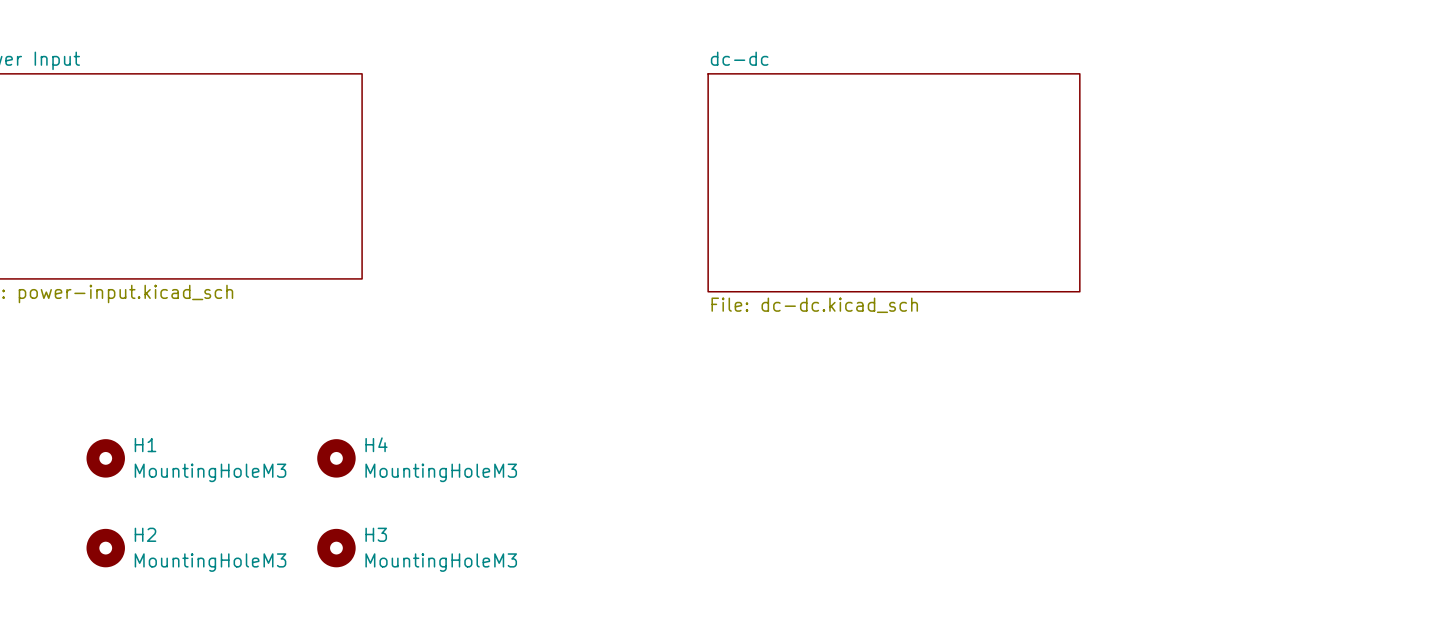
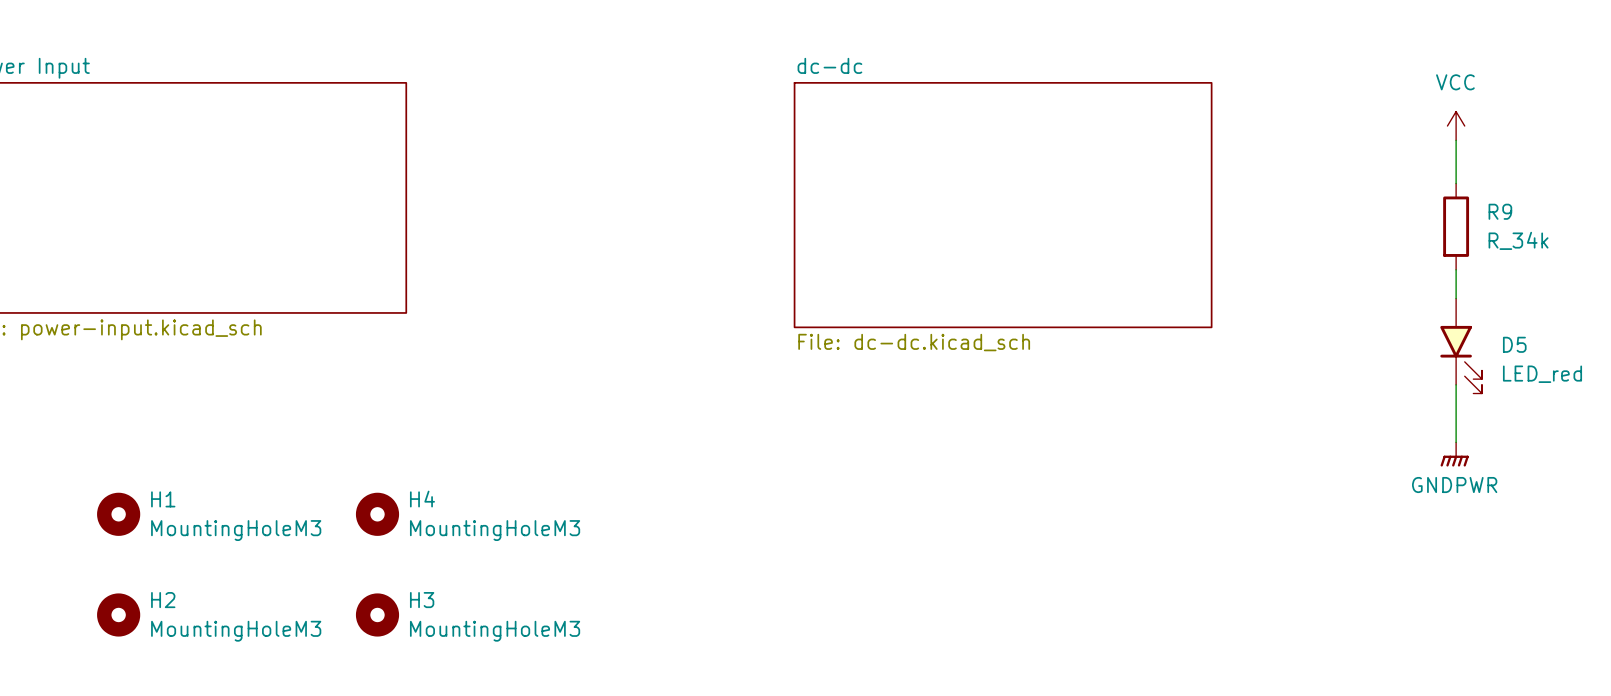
power symbol: none -> VCC (1456, 126)
wire: none -> (1456, 140) (1456, 183)
R9: none -> R_34k (1456, 226)
wire: none -> (1456, 269) (1456, 298)
D5: none -> LED_red (1461, 346)
wire: none -> (1456, 384) (1456, 442)
power symbol: none -> GNDPWR (1454, 454)

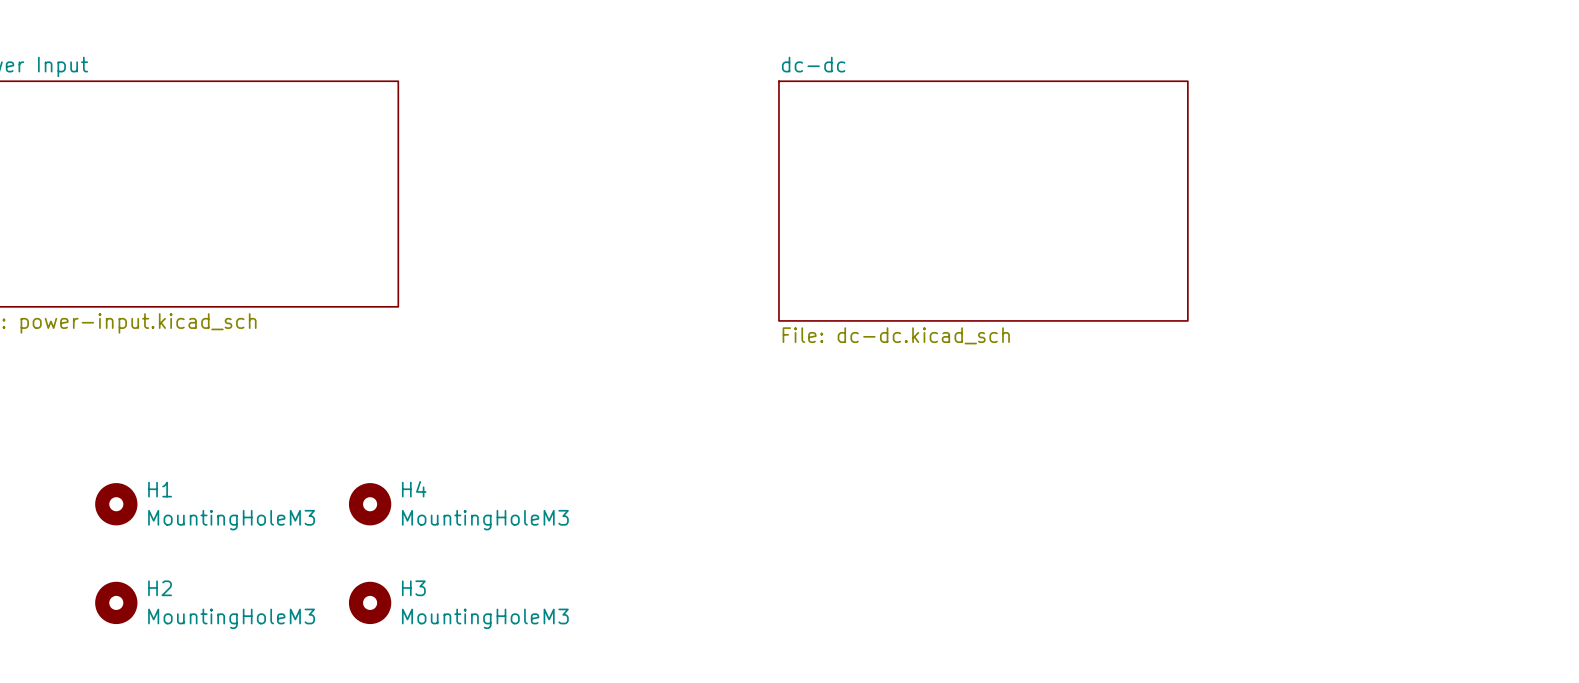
power symbol: VCC (1456, 126) -> none
wire: (1456, 140) (1456, 183) -> none
R9: R_34k (1456, 226) -> none
wire: (1456, 269) (1456, 298) -> none
D5: LED_red (1461, 346) -> none
wire: (1456, 384) (1456, 442) -> none
power symbol: GNDPWR (1454, 454) -> none

